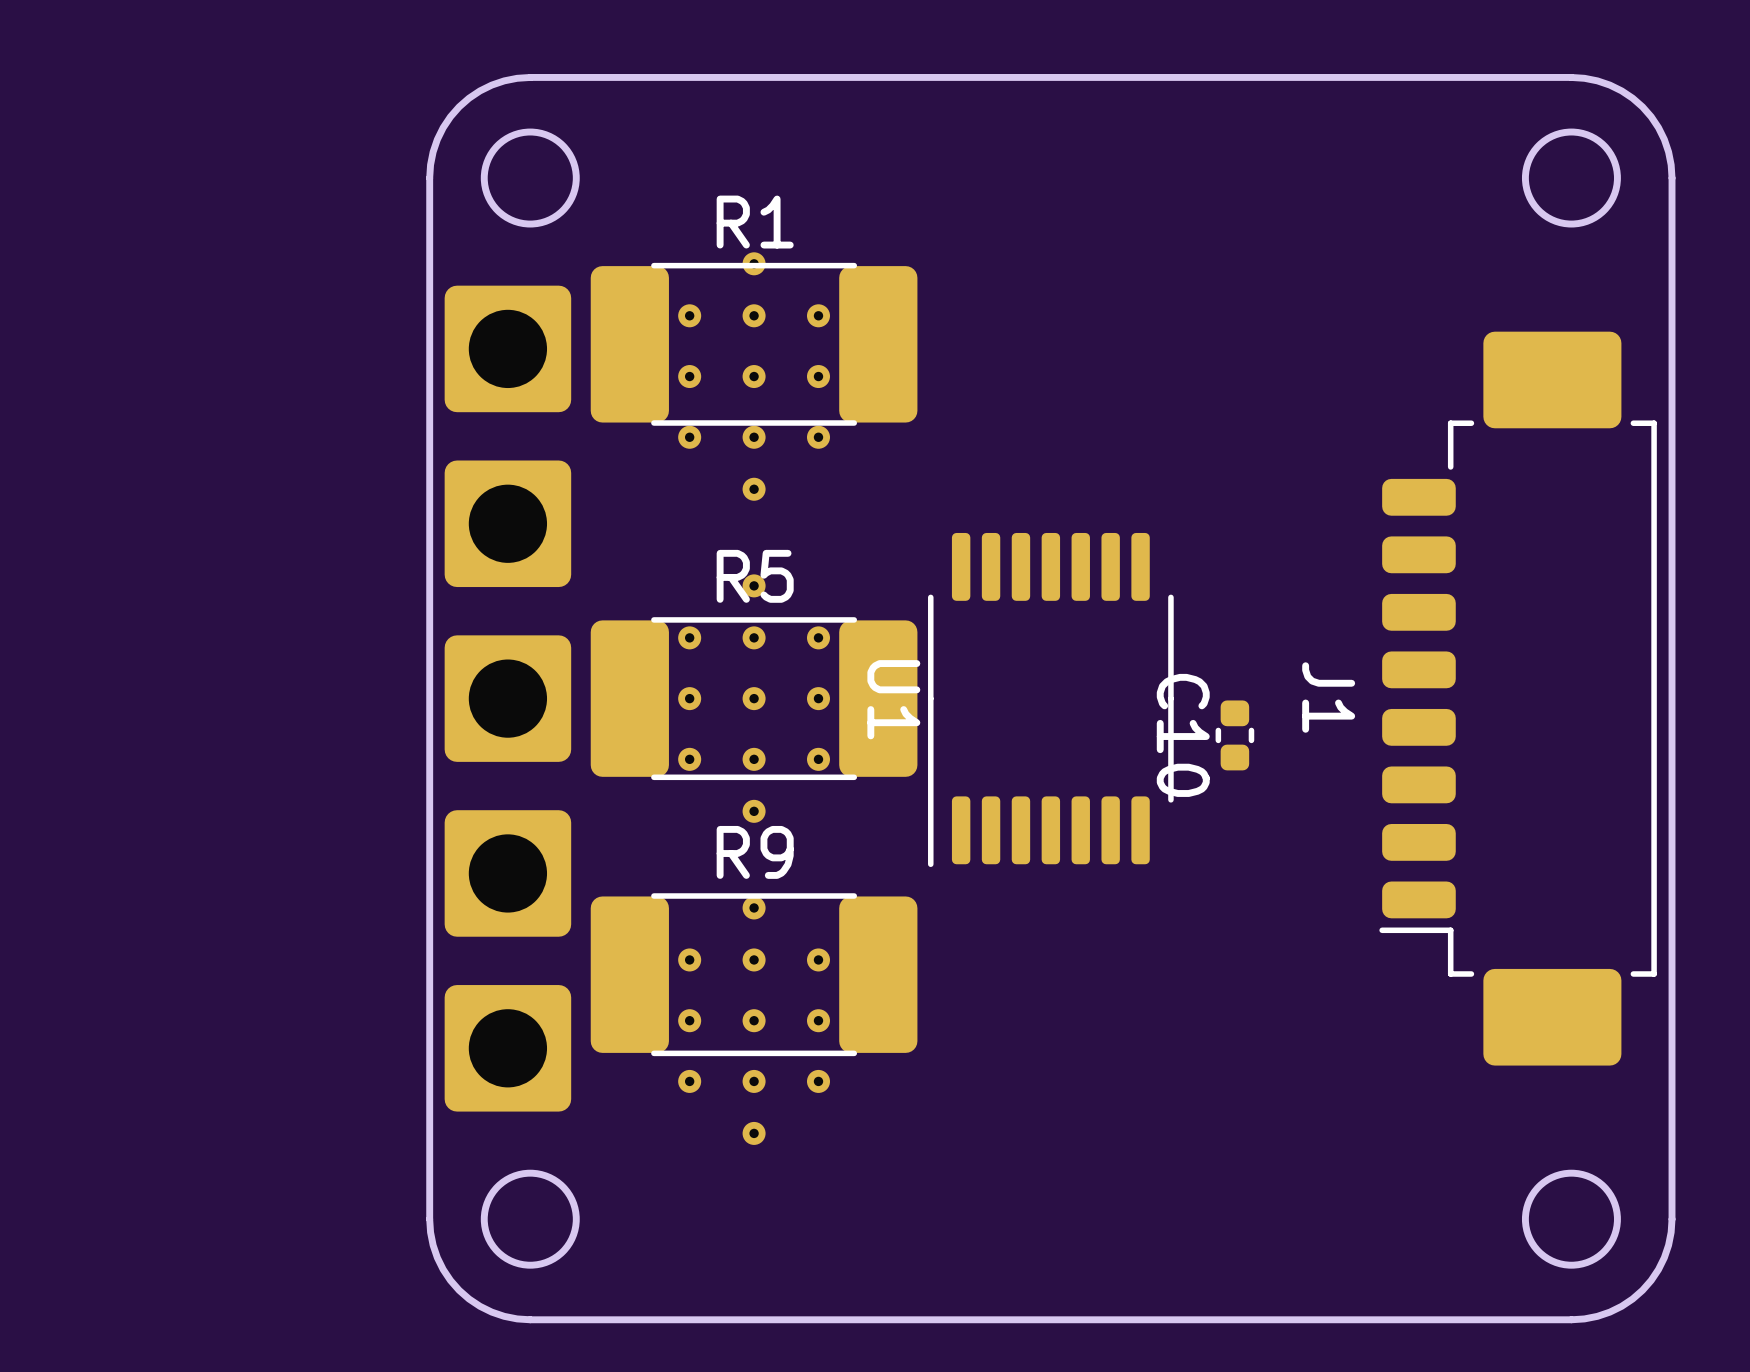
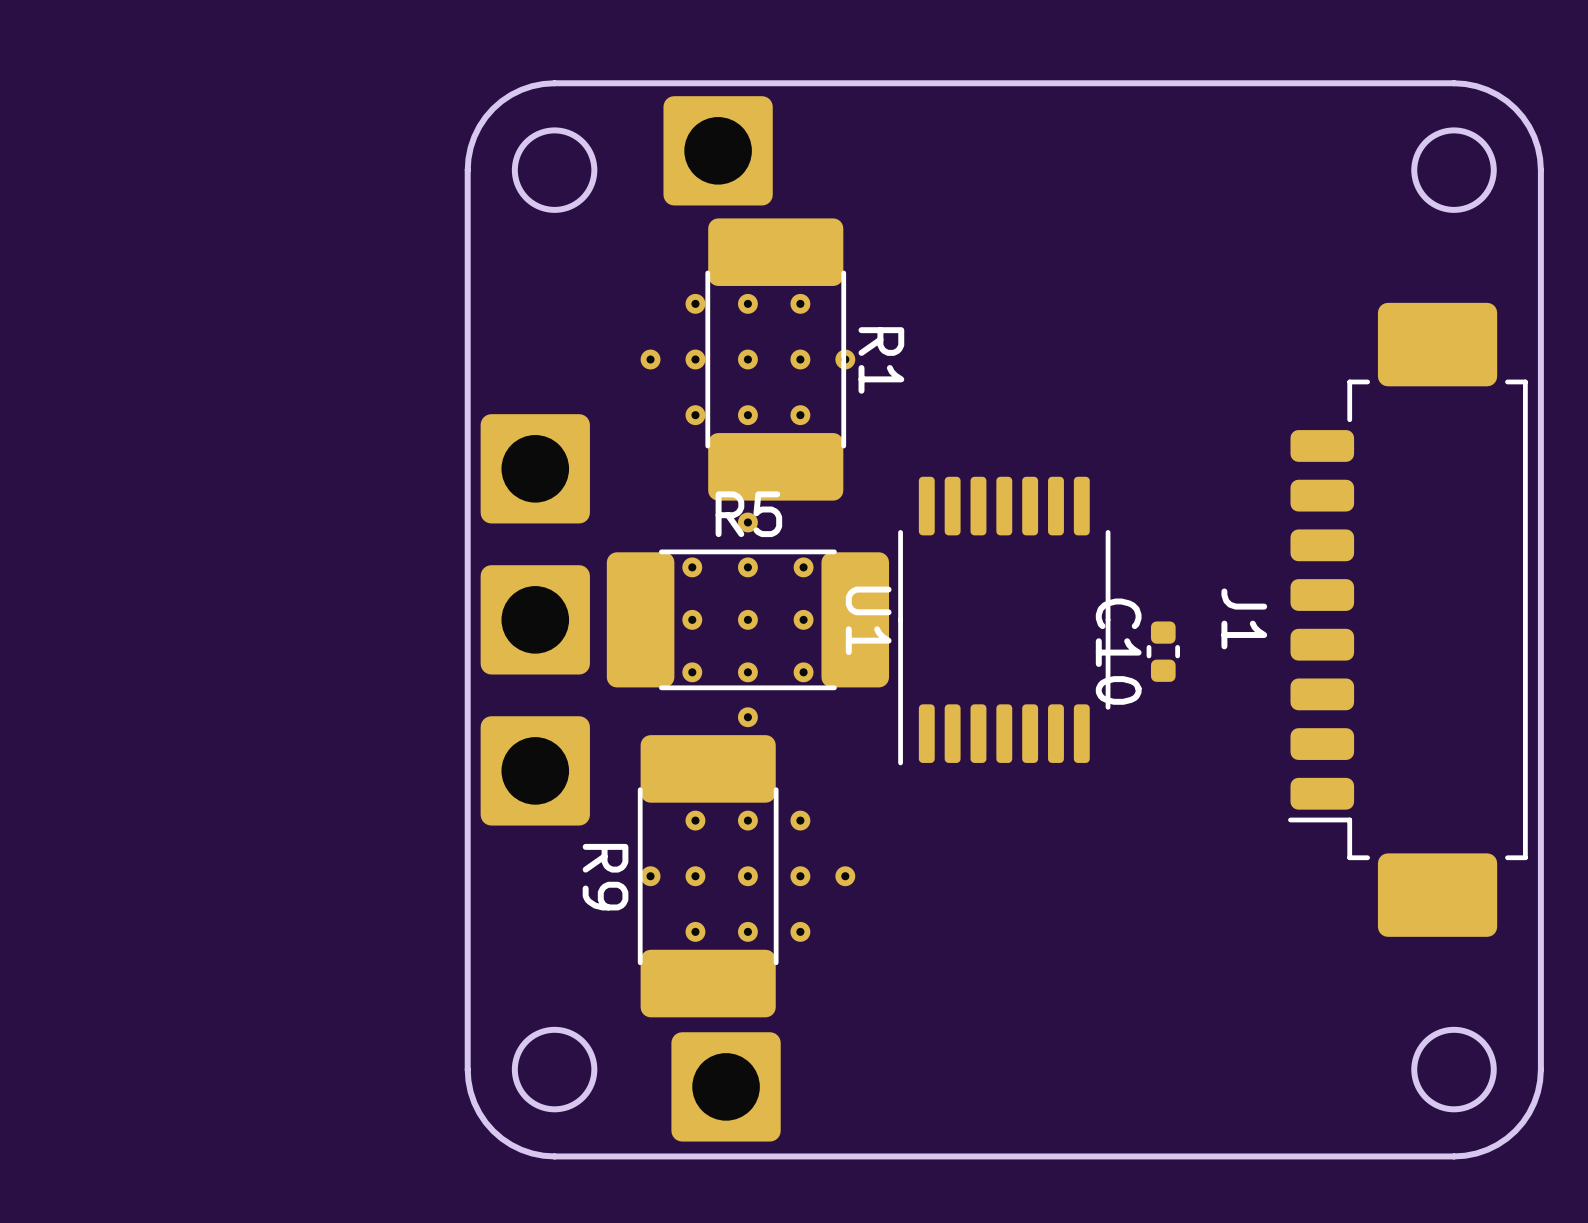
R1 rotation: 0° (754, 344) -> 90° clockwise (775, 359)
part position: (507, 348) -> (718, 150)
part rotation: 0° (754, 376) -> 90° clockwise (747, 359)
R9 name position: R9 (755, 852) -> R9 (605, 877)
R9 rotation: 0° (754, 974) -> 90° clockwise (708, 876)
part rotation: 0° (754, 1020) -> 90° clockwise (747, 876)
part position: (507, 1048) -> (726, 1086)

